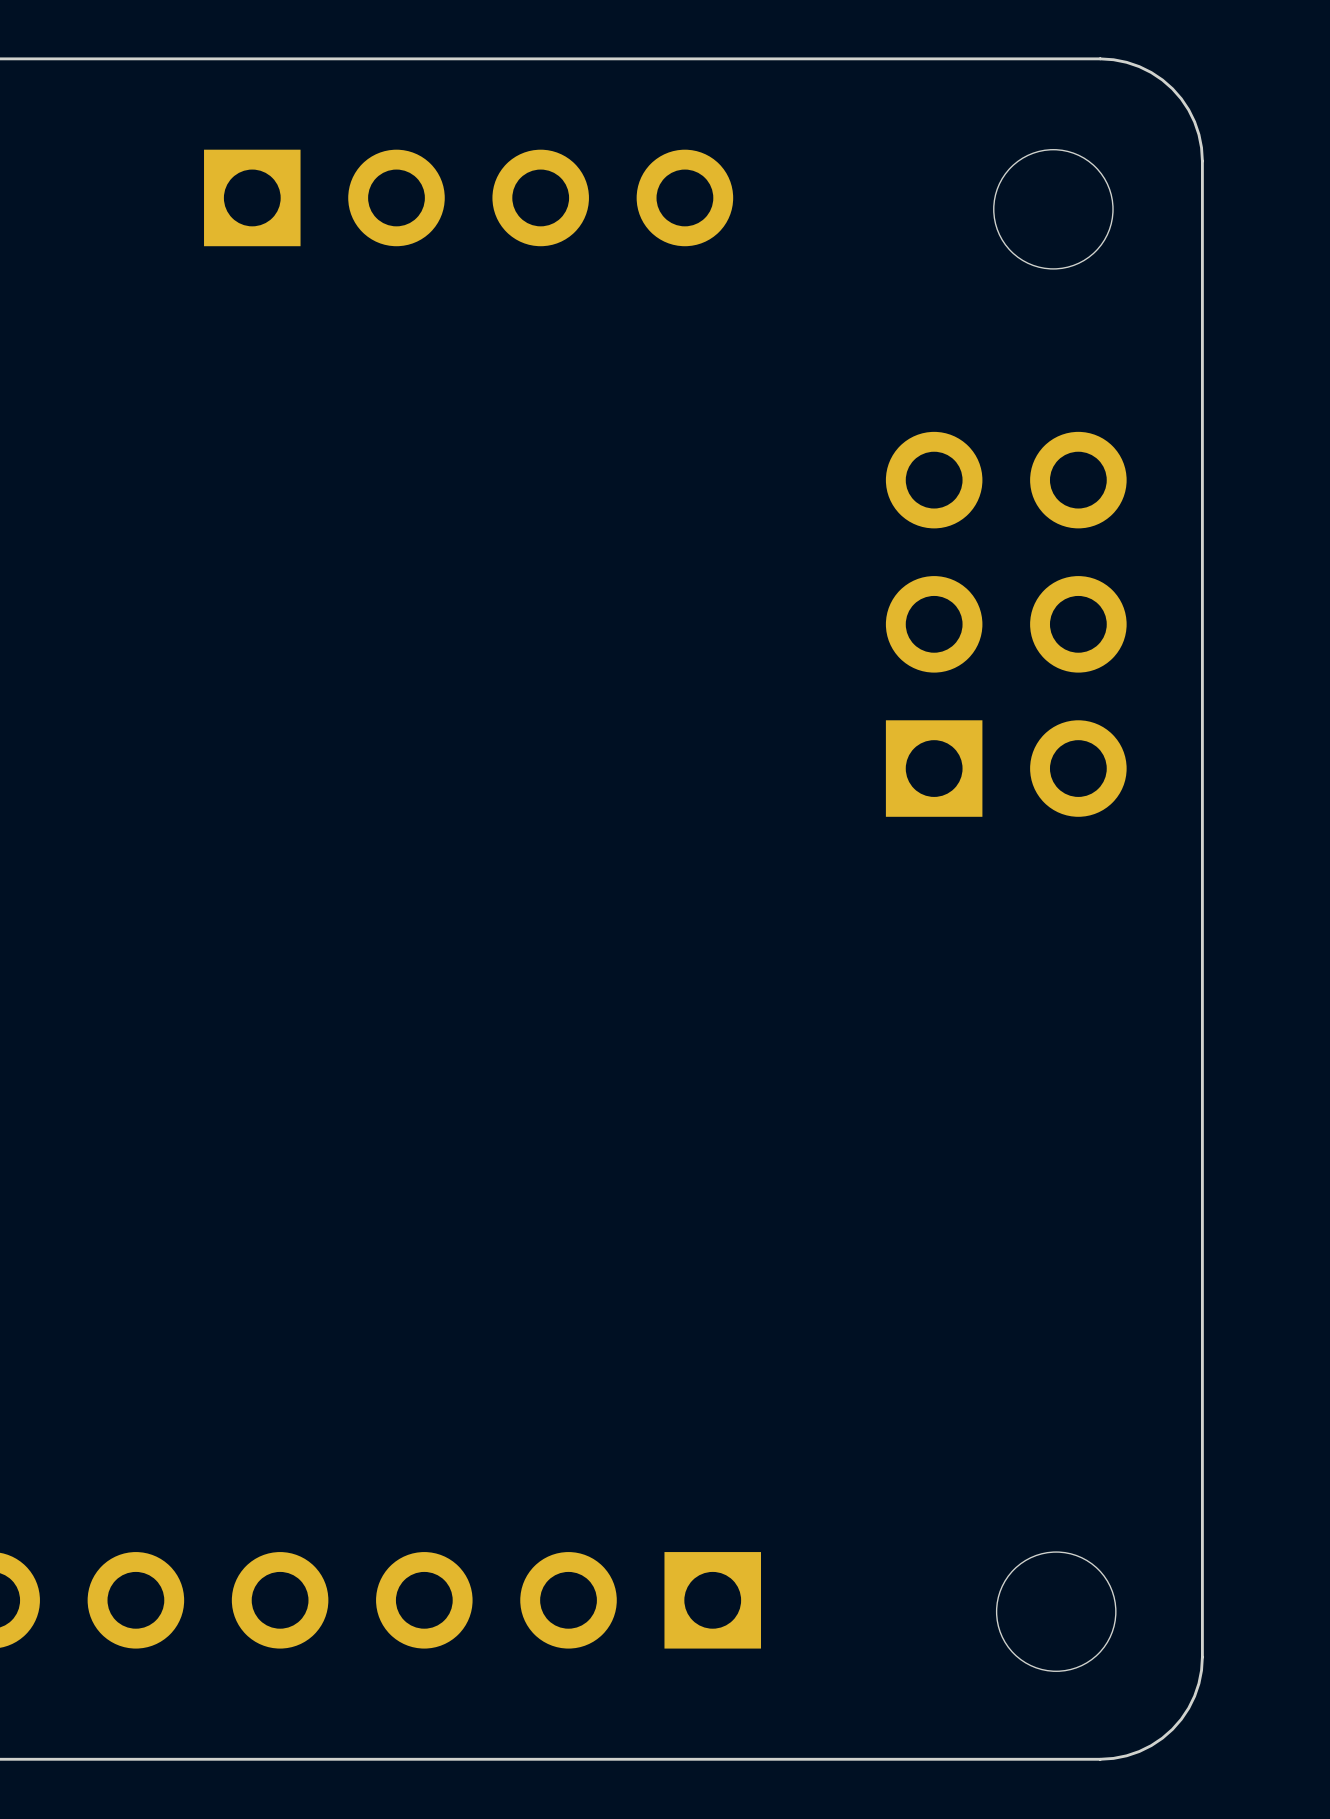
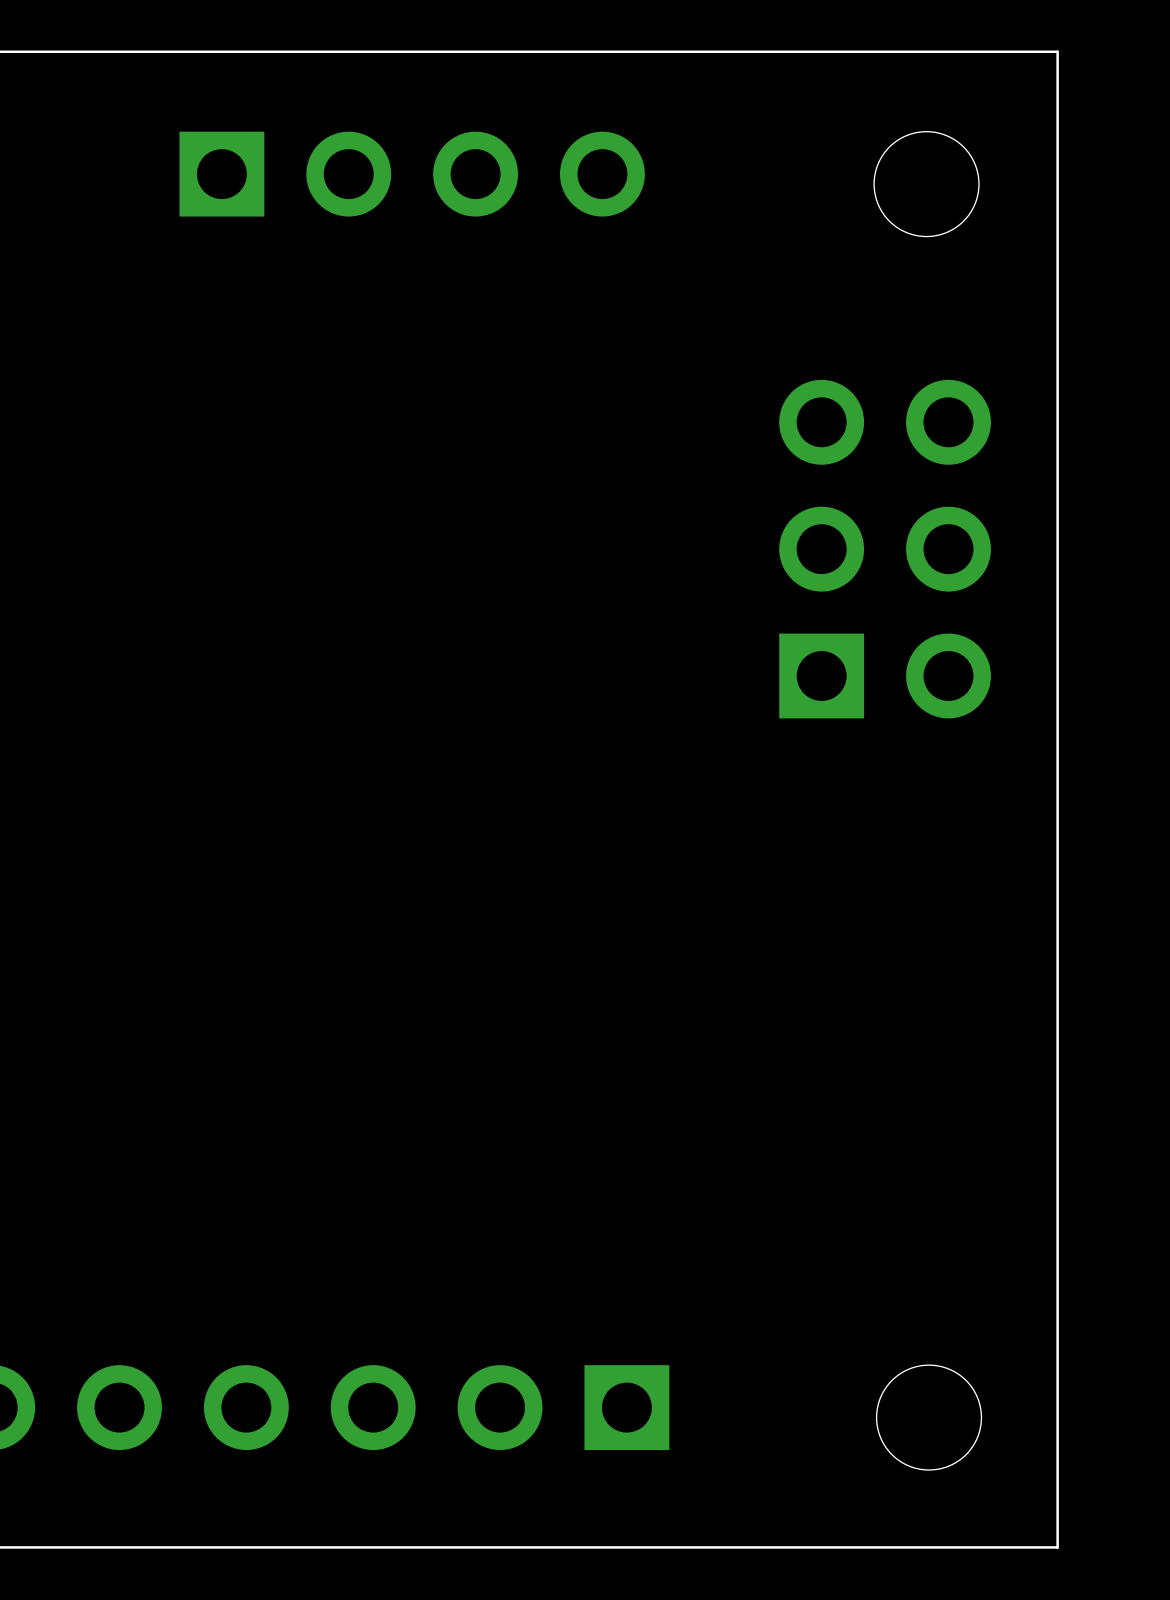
board edge: (1100, 58) (1113, 59) (1139, 66) (1162, 79) (1172, 88) (1188, 109) (1194, 121) (1198, 134) (1202, 161) -> (967, 51) (1057, 51) (1057, 141)
board edge: (1202, 1657) (1201, 1670) (1194, 1696) (1181, 1719) (1172, 1729) (1151, 1745) (1139, 1751) (1126, 1755) (1100, 1759) -> (1057, 1457) (1057, 1547) (967, 1547)

